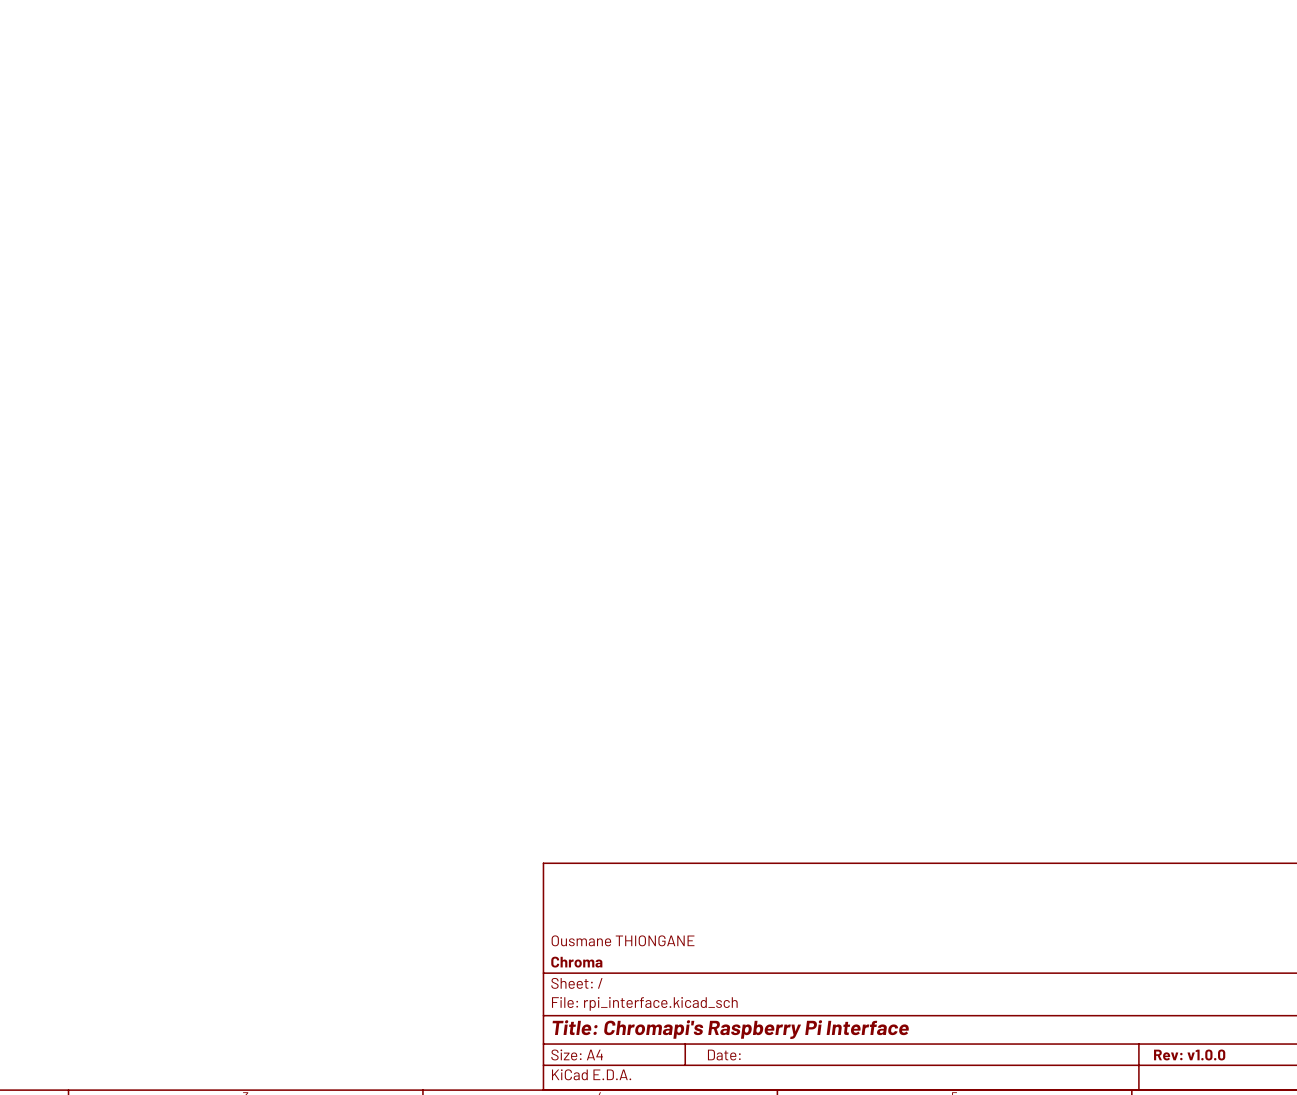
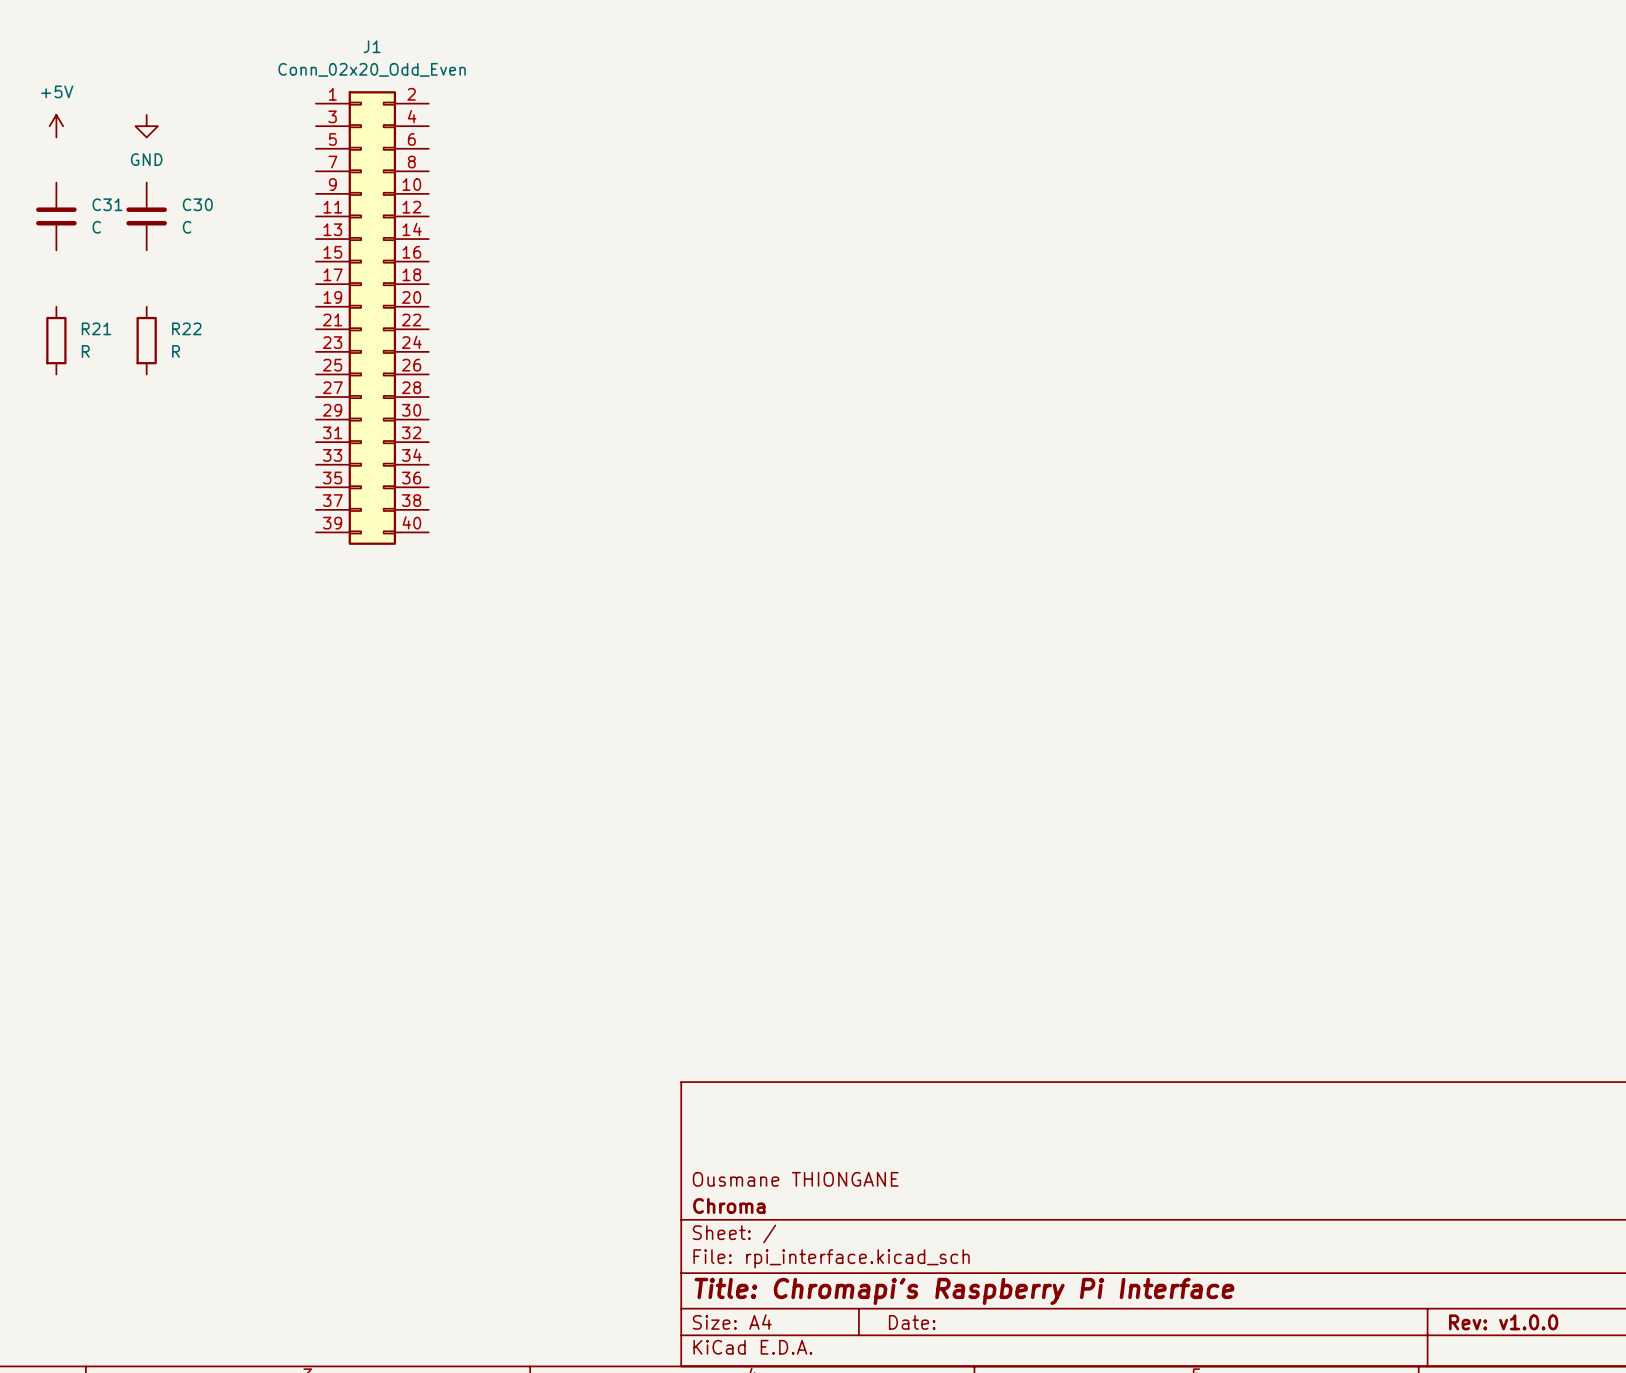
power symbol: none -> +5V (56, 126)
power symbol: none -> GND (146, 126)
C31: none -> C (56, 216)
C30: none -> C (146, 216)
J1: none -> Conn_02x20_Odd_Even (372, 318)
R21: none -> R (56, 340)
R22: none -> R (146, 340)

